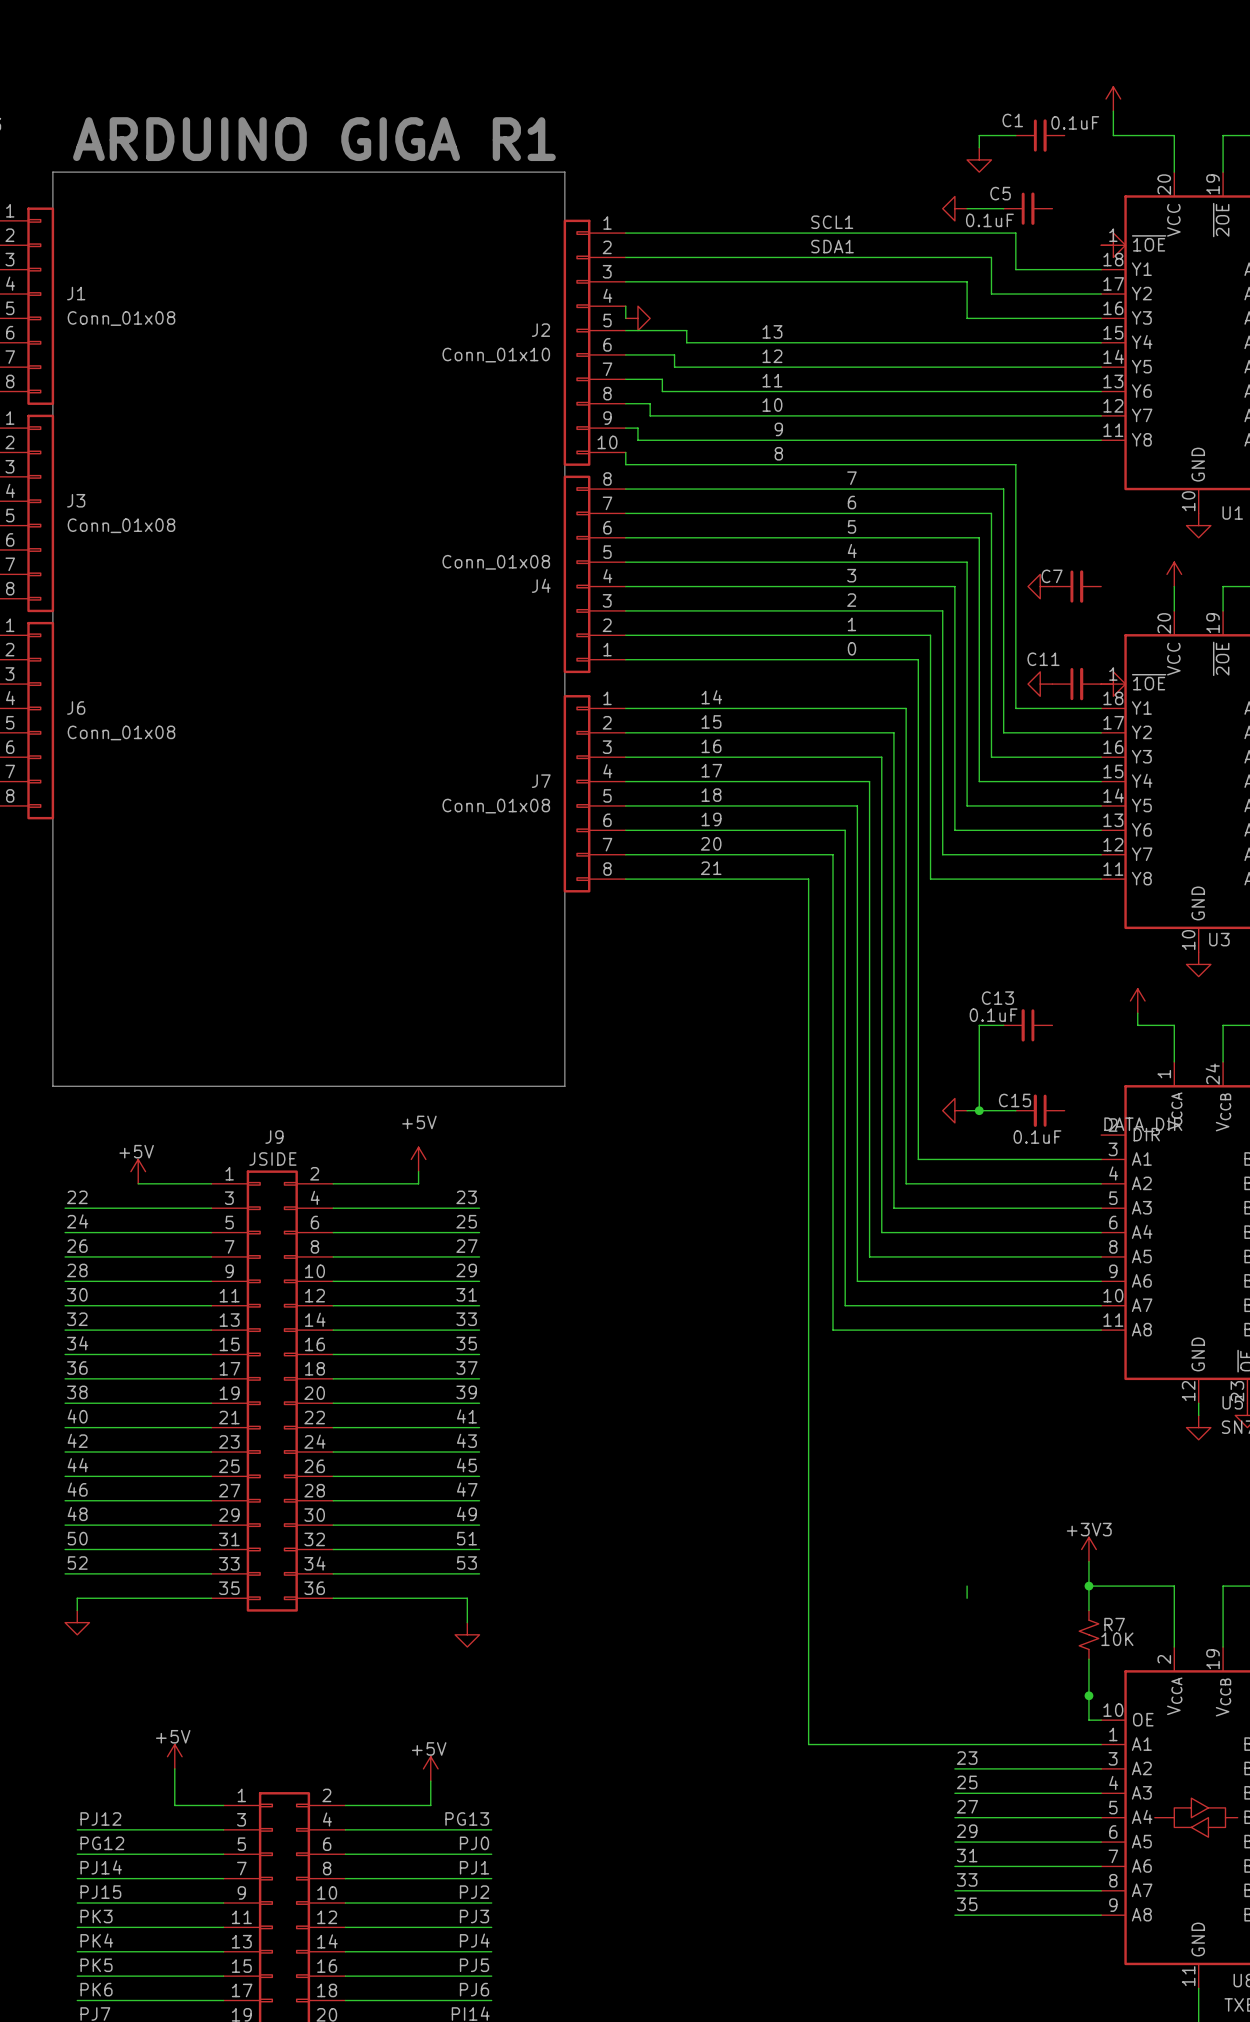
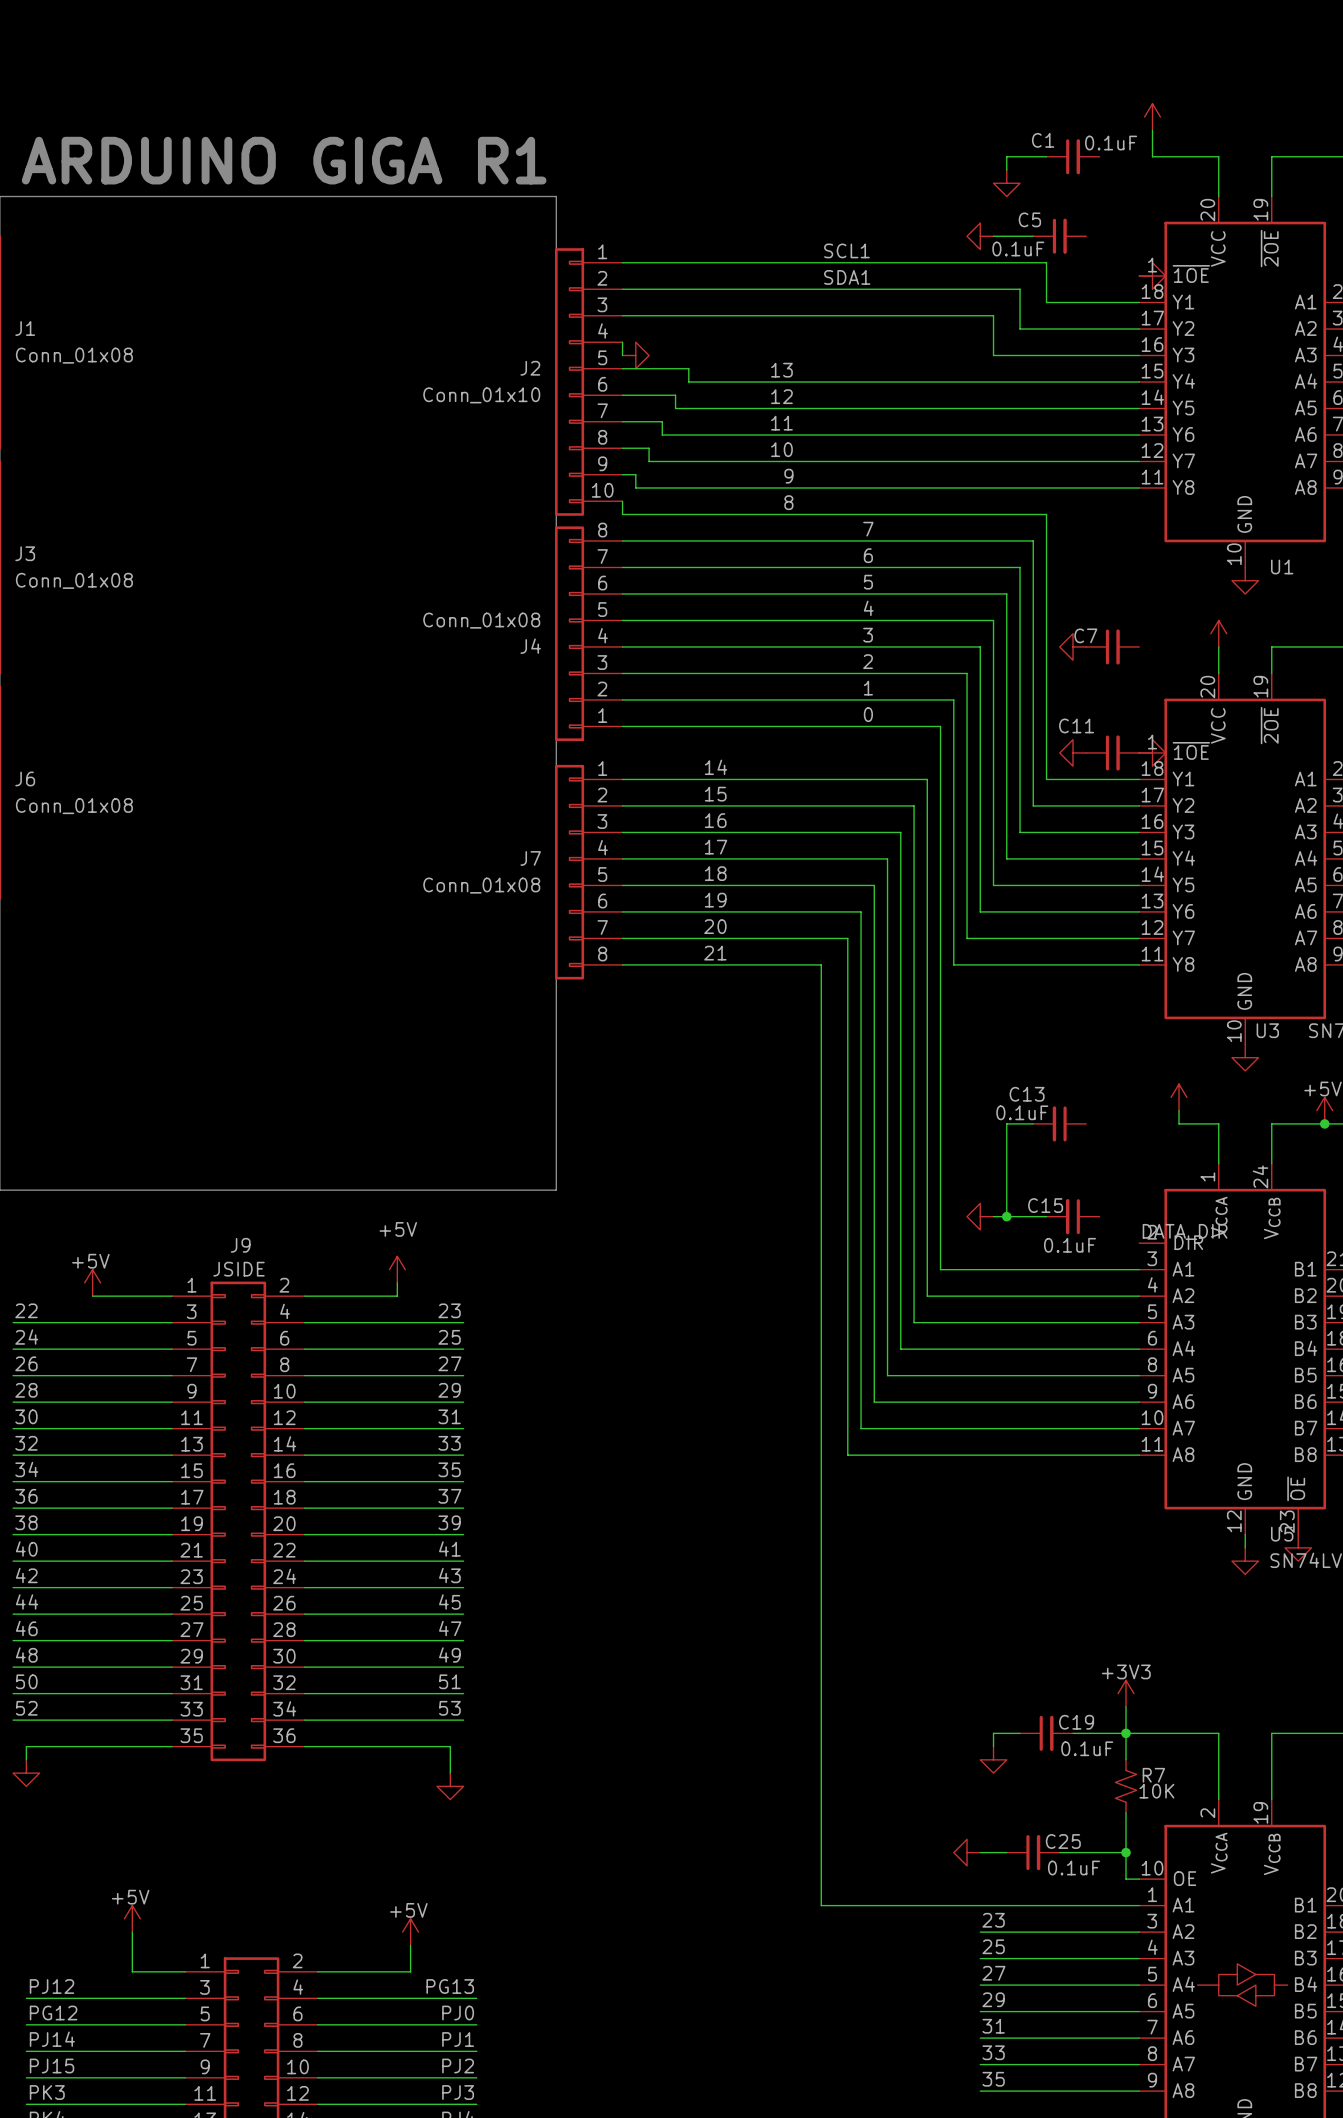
wire: none -> (993, 1733) (1020, 1733)
C19: none -> 0.1uF (1046, 1733)
wire: none -> (1073, 1733) (1126, 1733)
power symbol: none -> (993, 1759)
power symbol: none -> (967, 1852)
wire: none -> (980, 1852) (1006, 1852)
C25: none -> 0.1uF (1033, 1852)
wire: none -> (1059, 1852) (1126, 1852)

